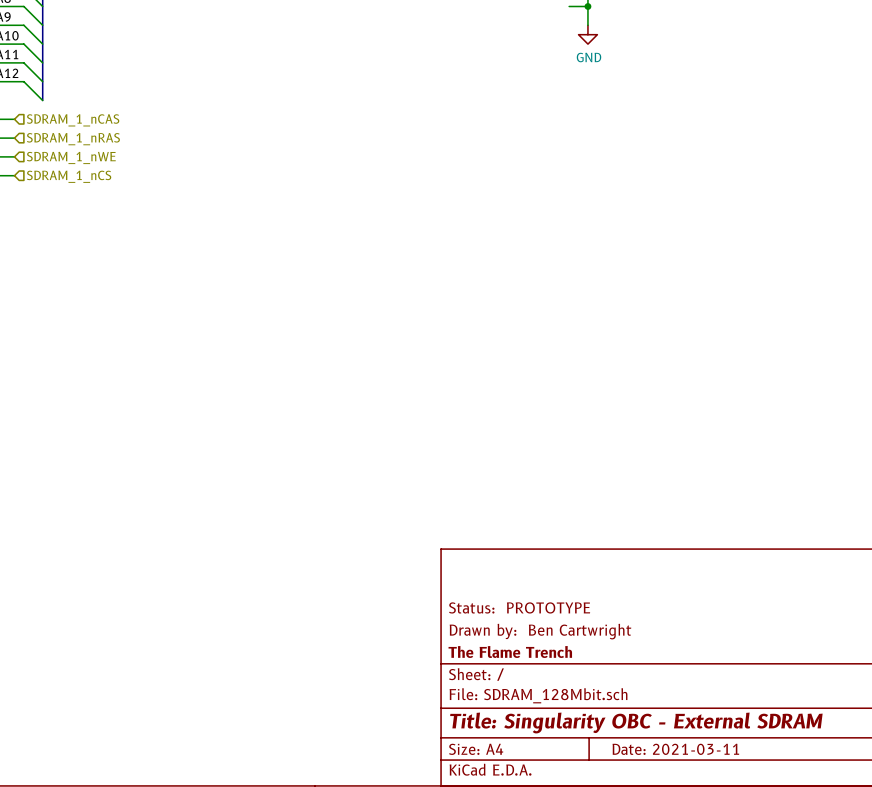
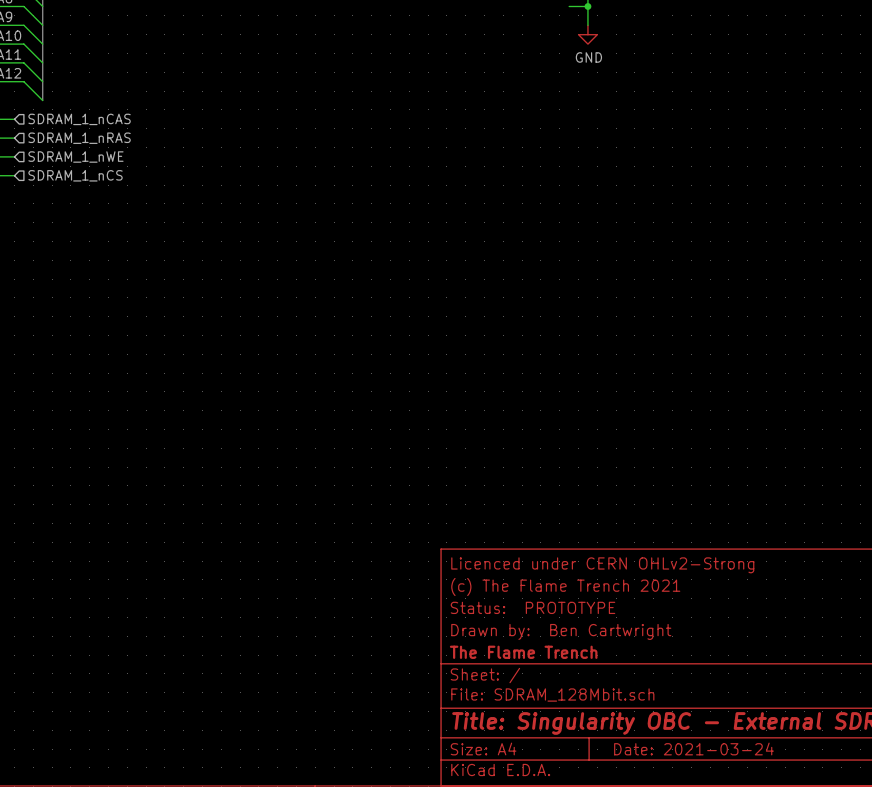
title block: none -> Licenced under CERN OHLv2-Strong (602, 565)
title block: none -> (c) The Flame Trench 2021 (565, 586)
title block: Date: 2021-03-11 (675, 749) -> Date: 2021-03-24 (694, 749)

